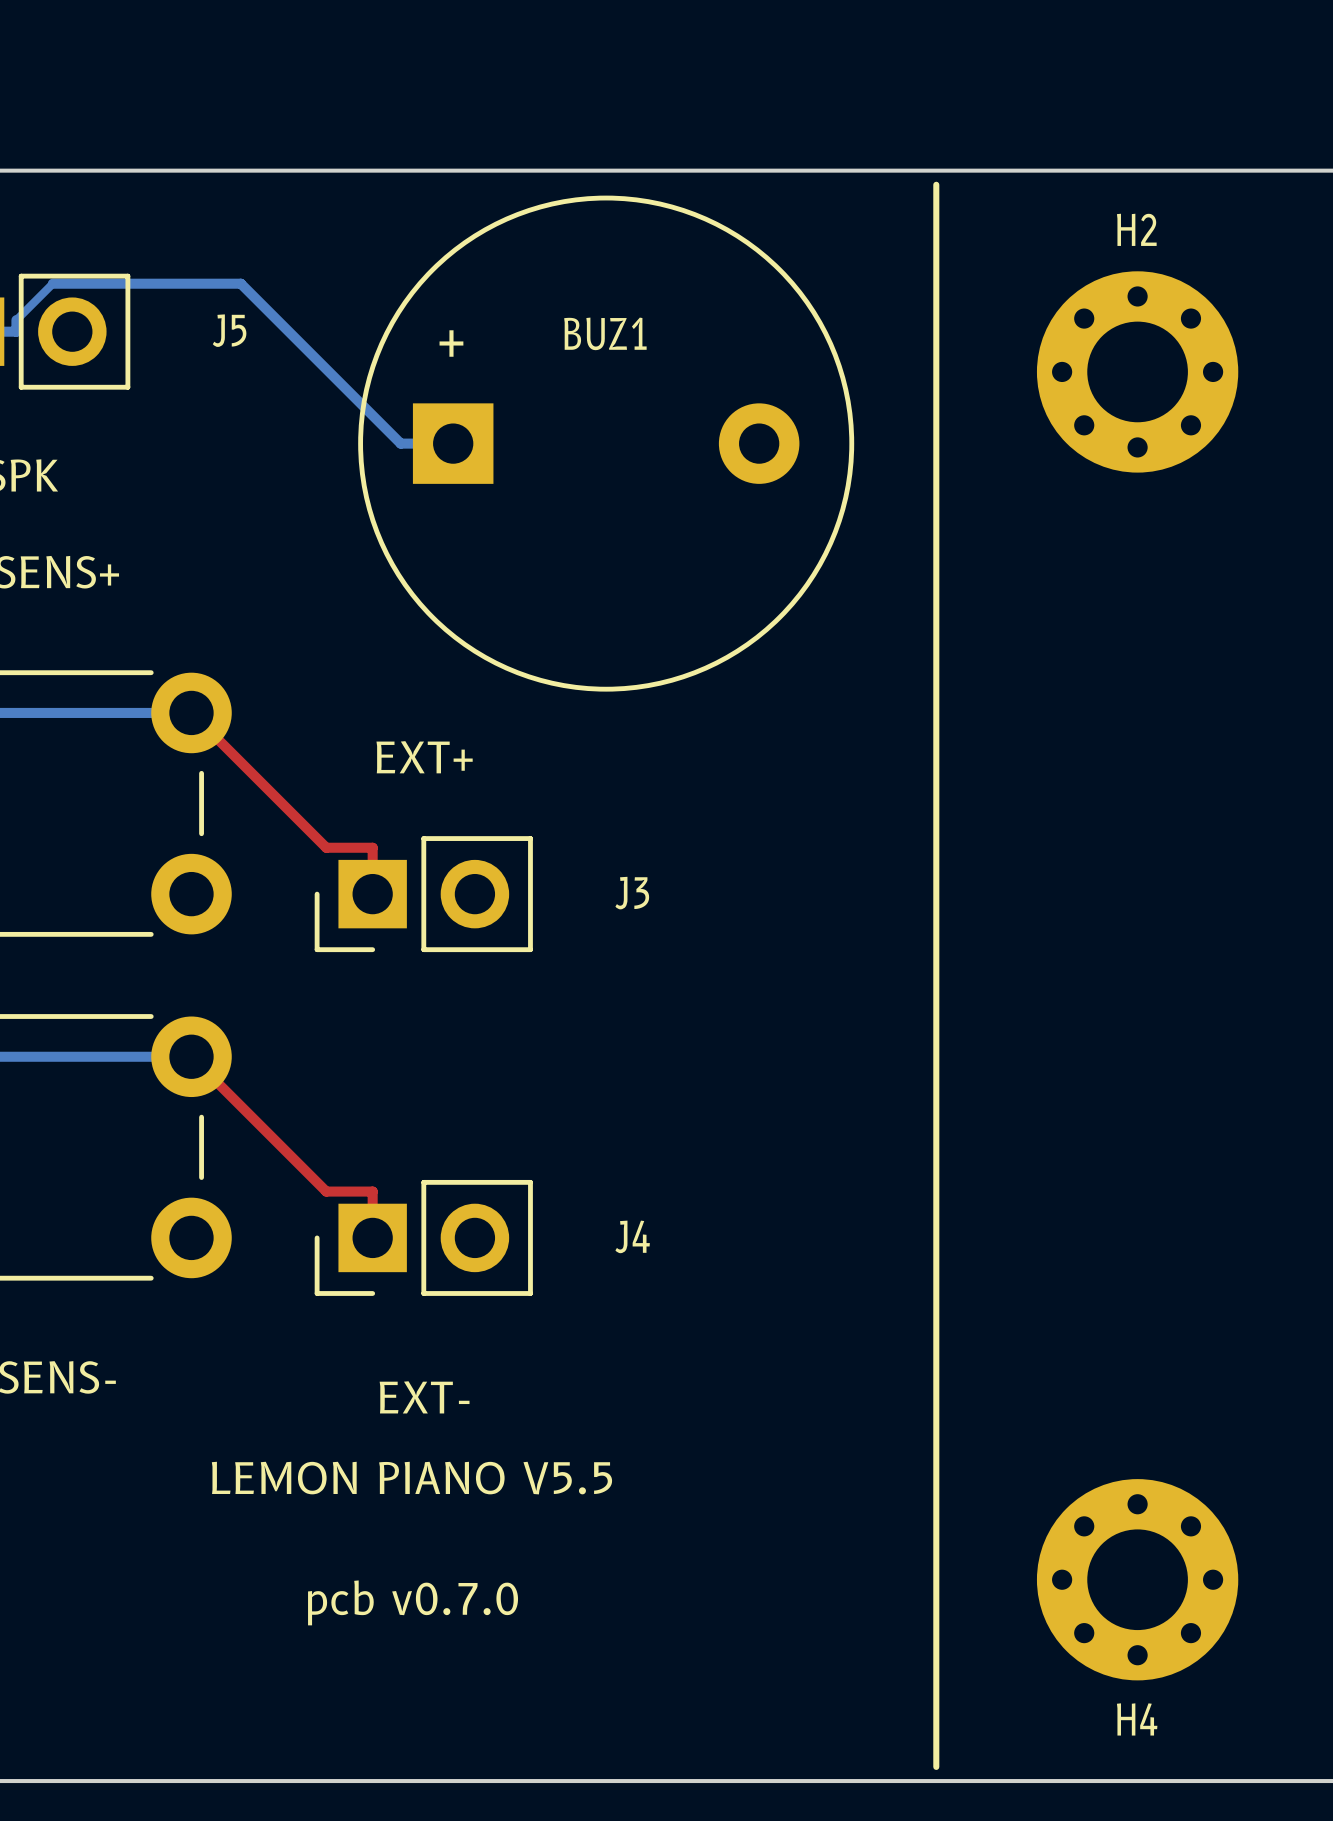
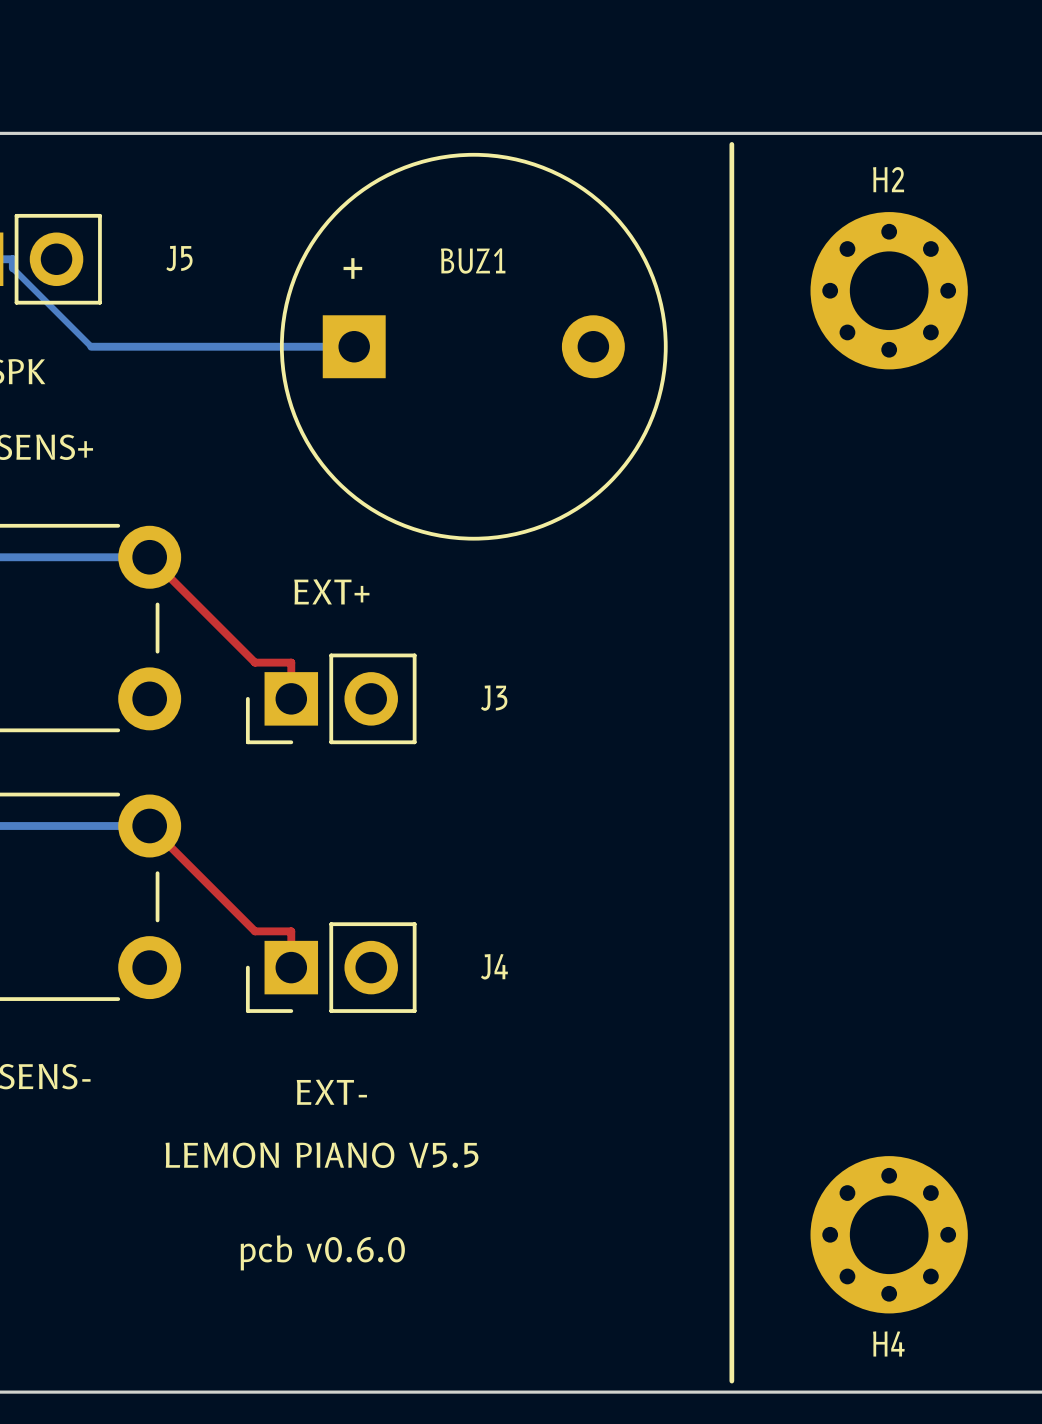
bottom track: (16, 331) (16, 320) (52, 283) (240, 283) (400, 443) -> (12, 259) (12, 268) (91, 346) (313, 346)
text: pcb v0.7.0 (413, 1602) -> pcb v0.6.0 (322, 1252)

